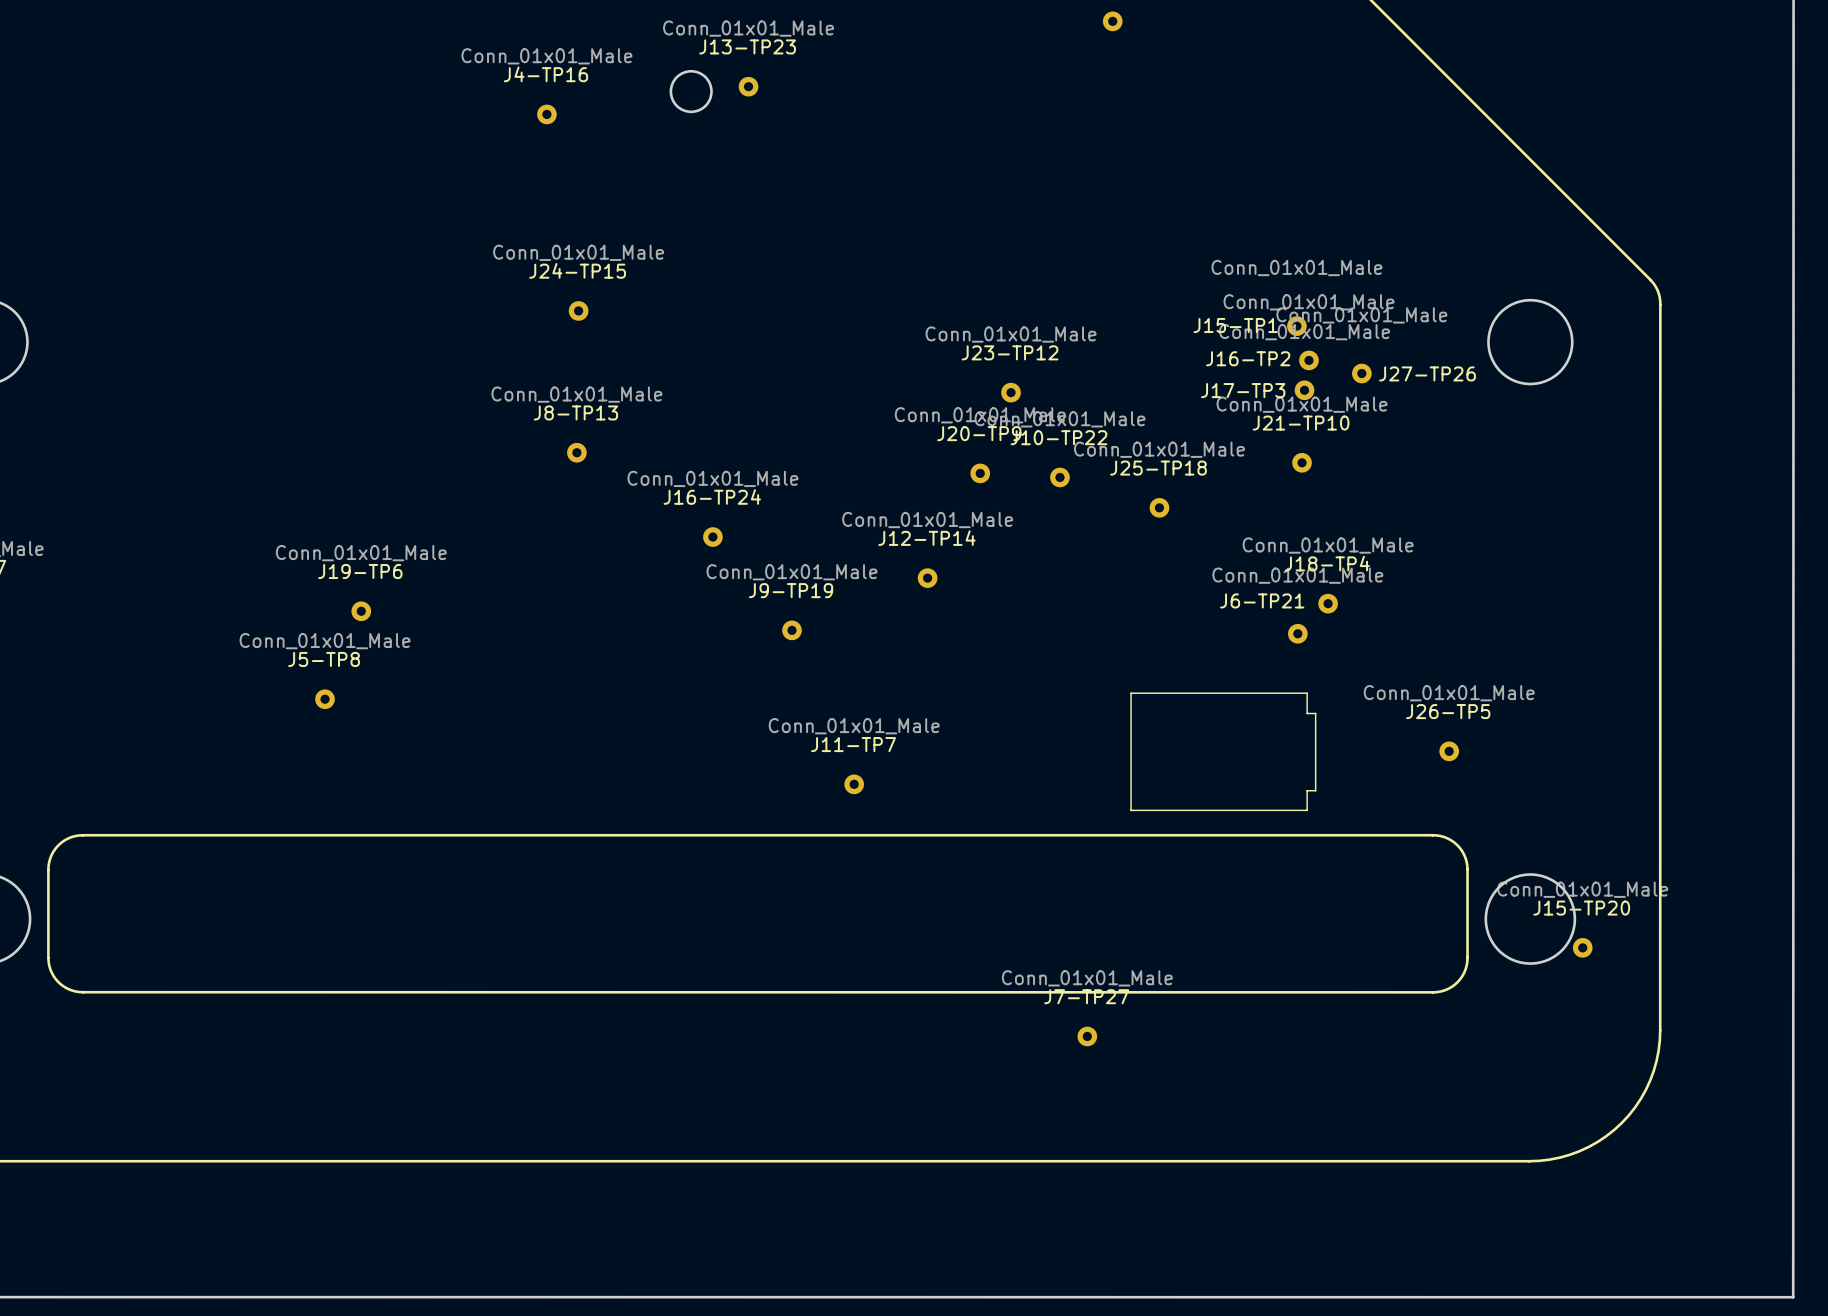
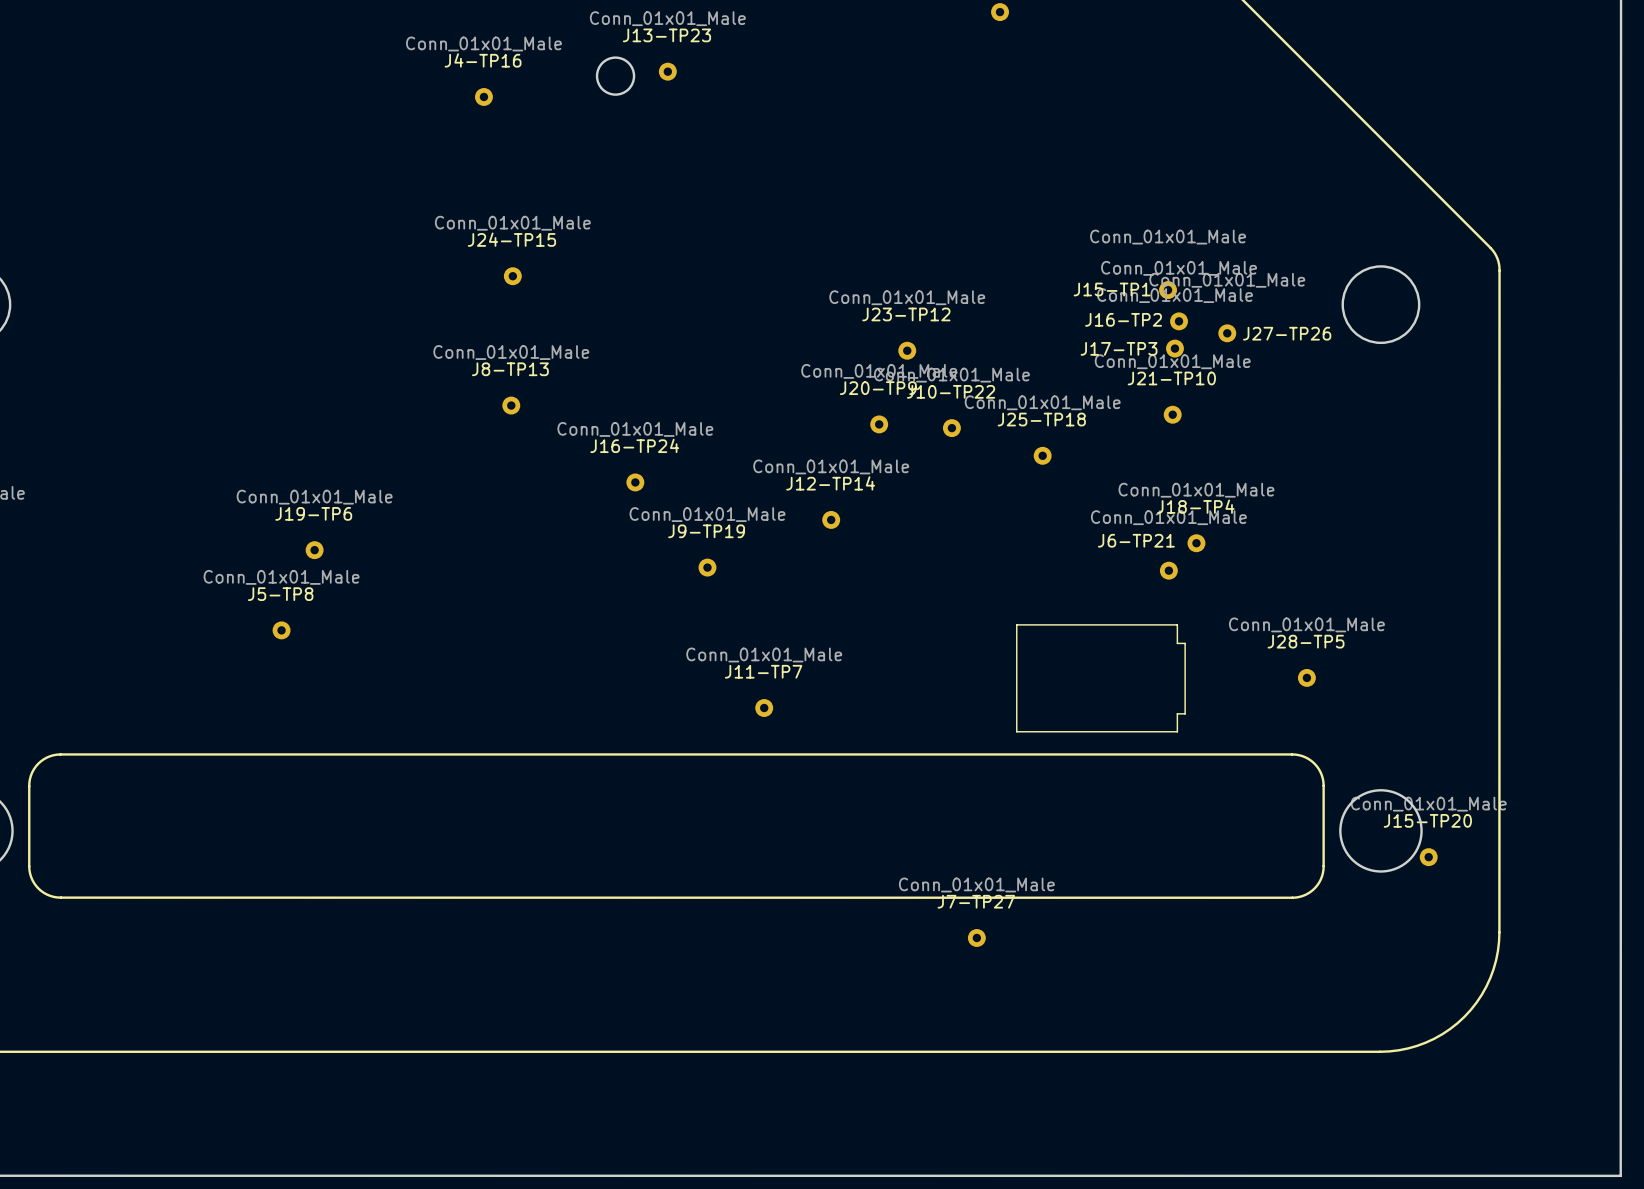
J26-TP5 name: J26-TP5 (1448, 711) -> J28-TP5 (1306, 641)

